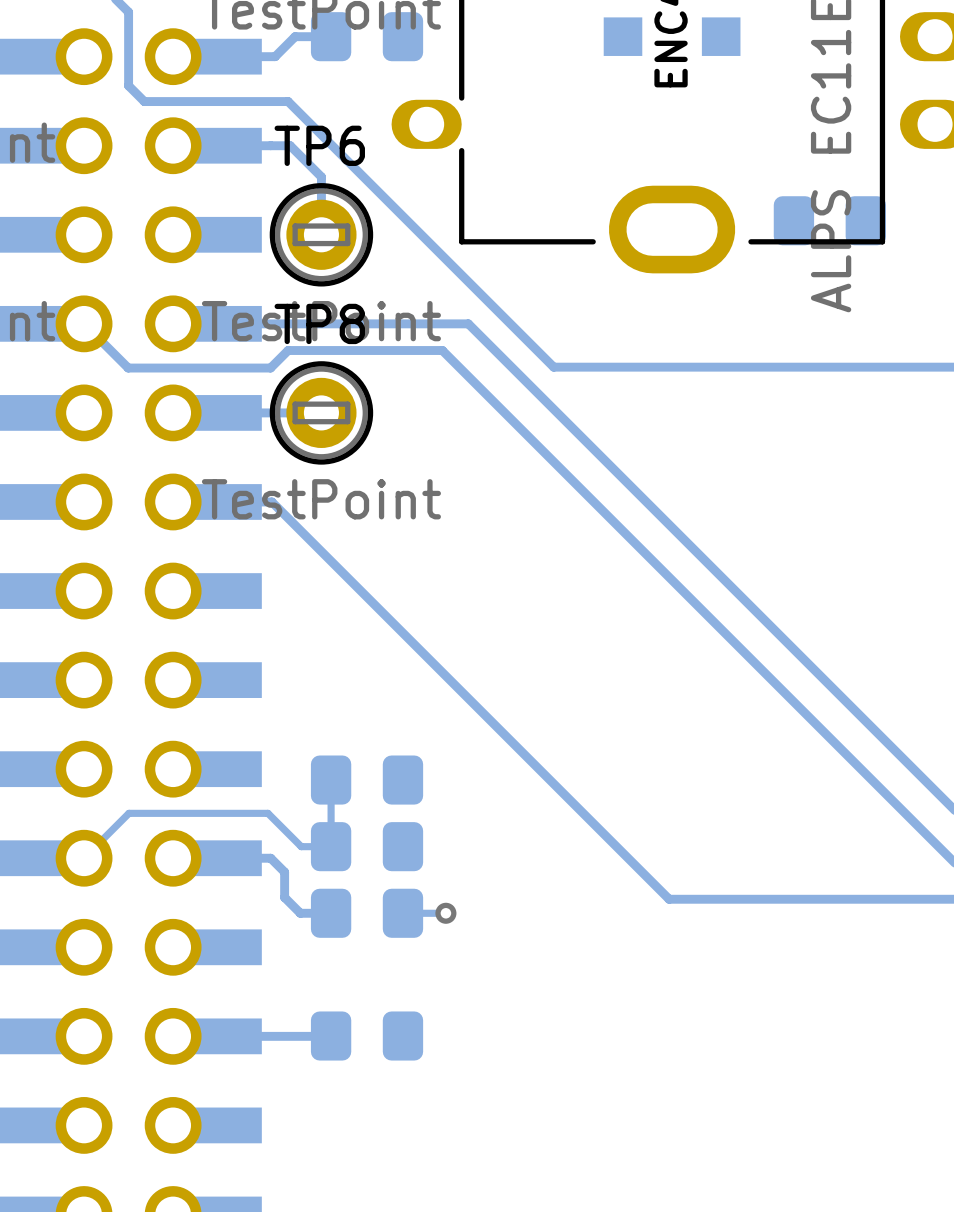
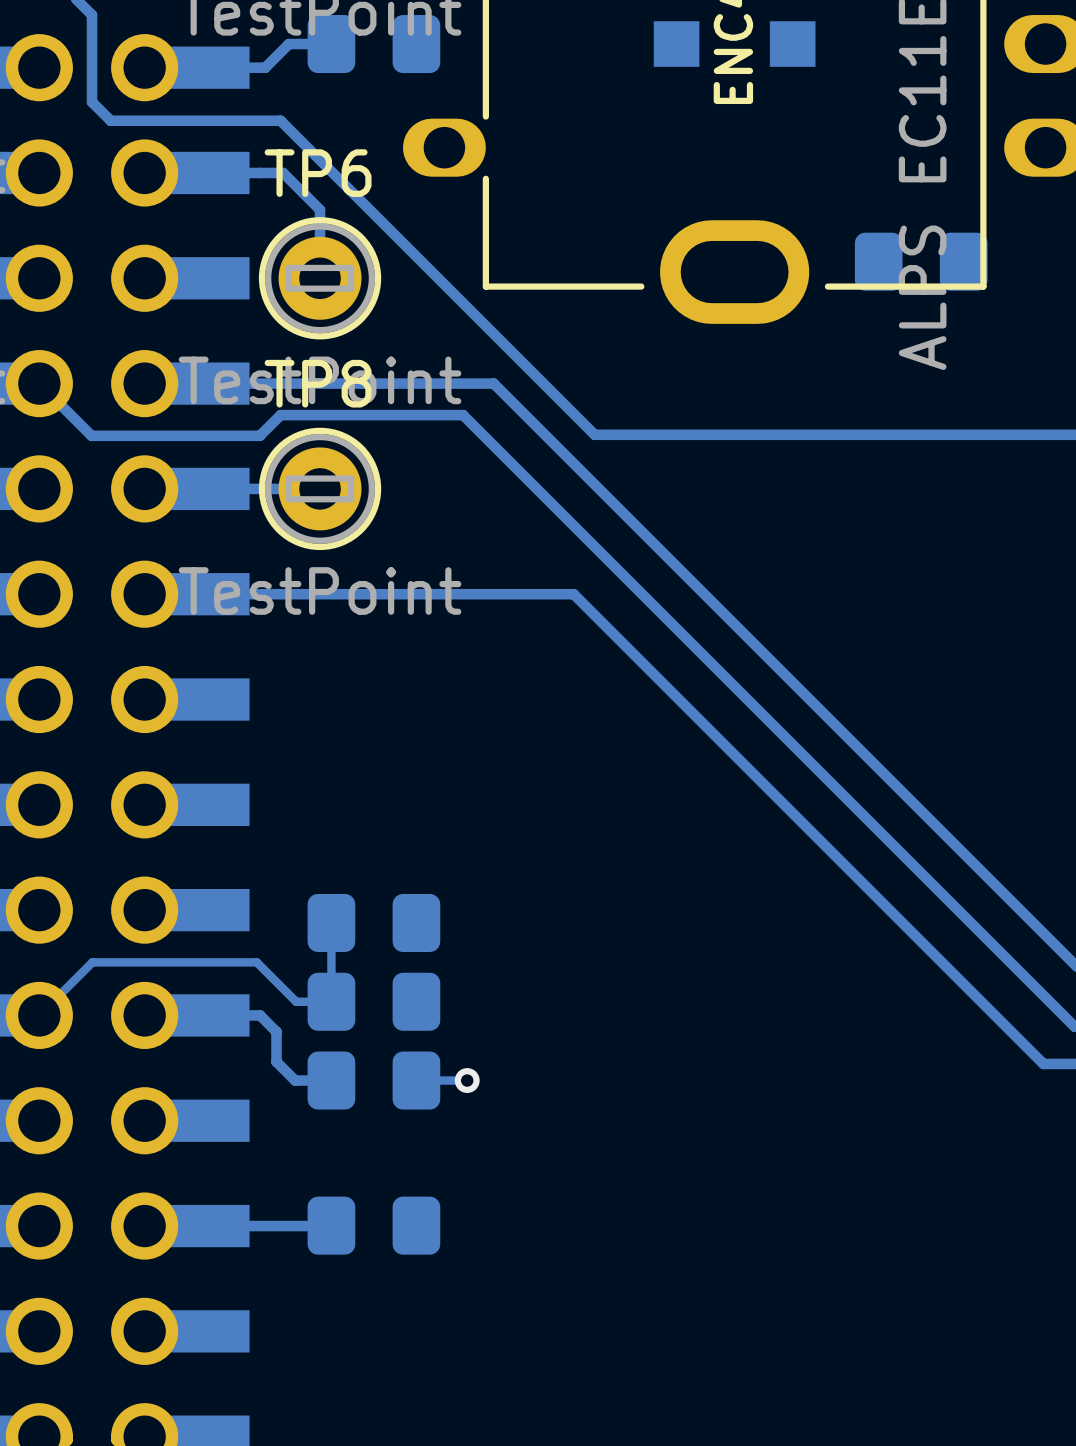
bottom track: (271, 501) (669, 899) (933, 899) -> (261, 594) (573, 594) (1043, 1063)

